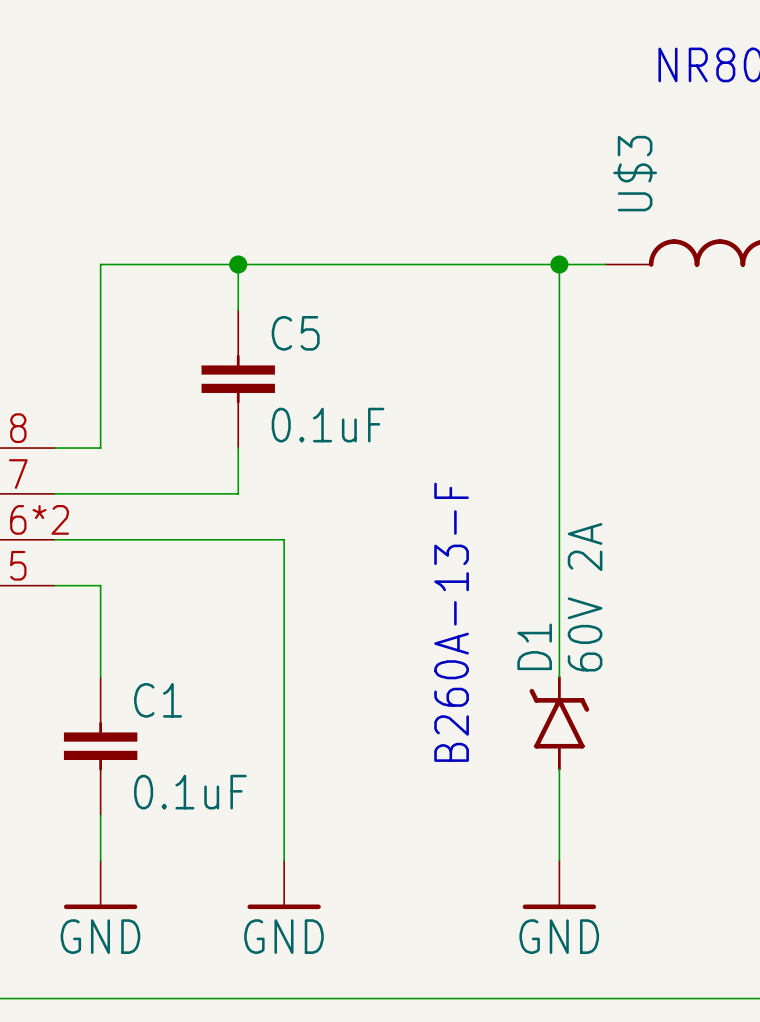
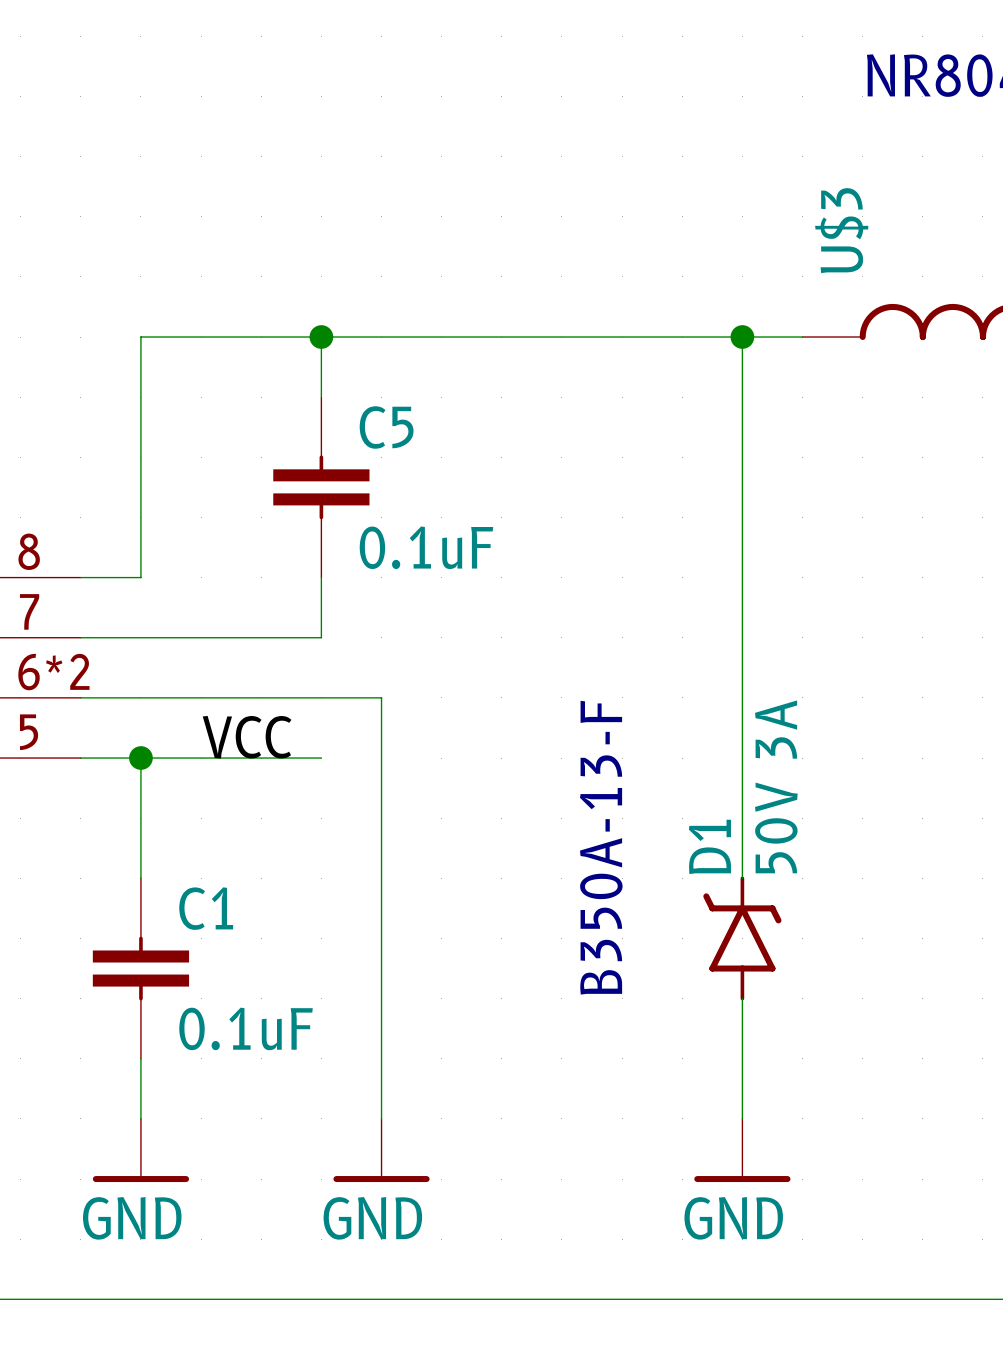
label: none -> VCC (247, 737)
wire: none -> (140, 758) (321, 758)
junction: none -> (140, 758)
D1 value: 60V 2A (585, 597) -> 50V 3A (776, 786)
text: B260A-13-F (451, 622) -> B350A-13-F (601, 847)

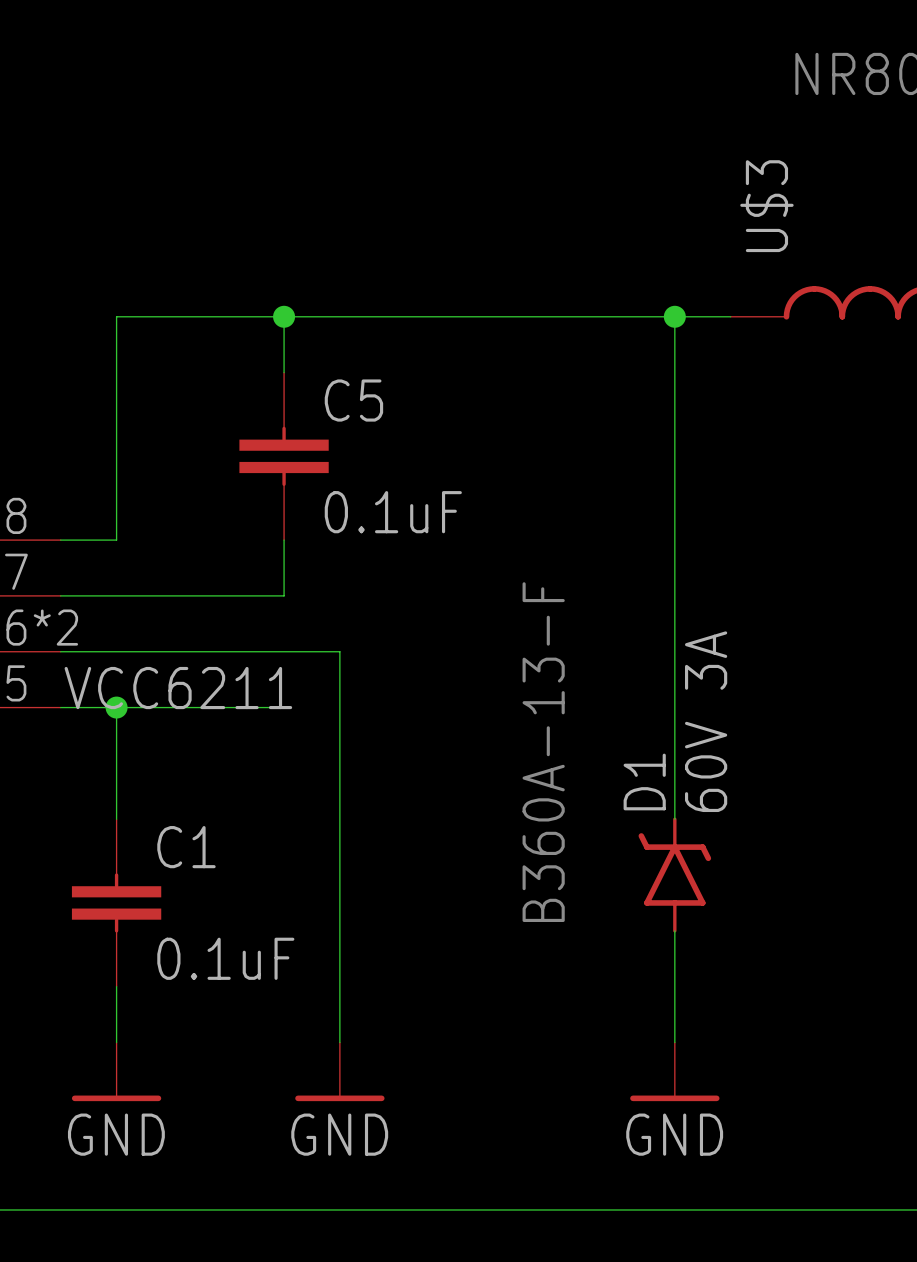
label: none -> VCC6211 (178, 688)
label: VCC (247, 737) -> none
D1 value: 50V 3A (776, 786) -> 60V 3A (706, 721)
text: B350A-13-F (601, 847) -> B360A-13-F (543, 752)

